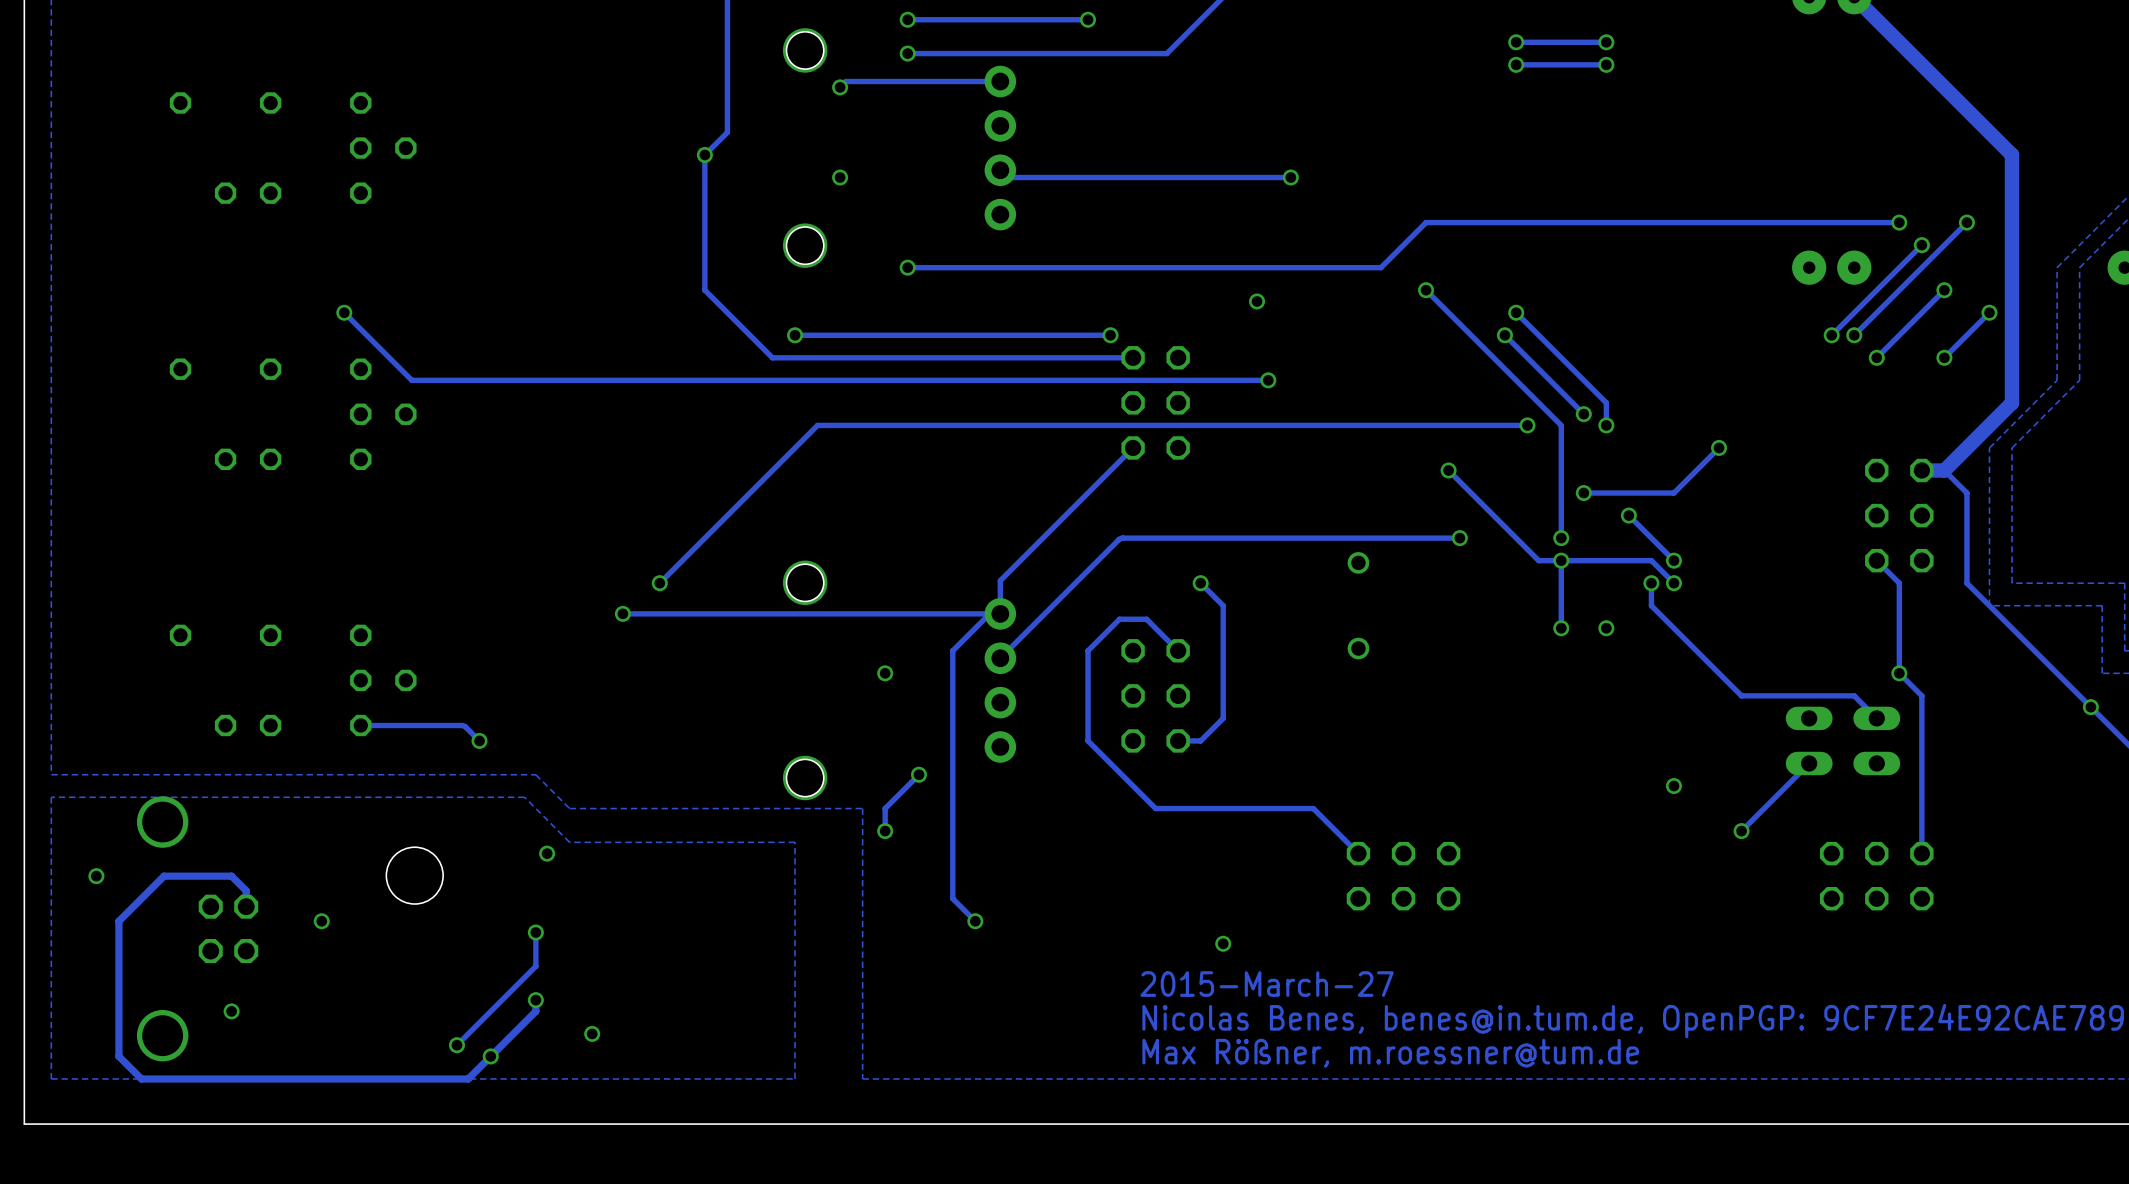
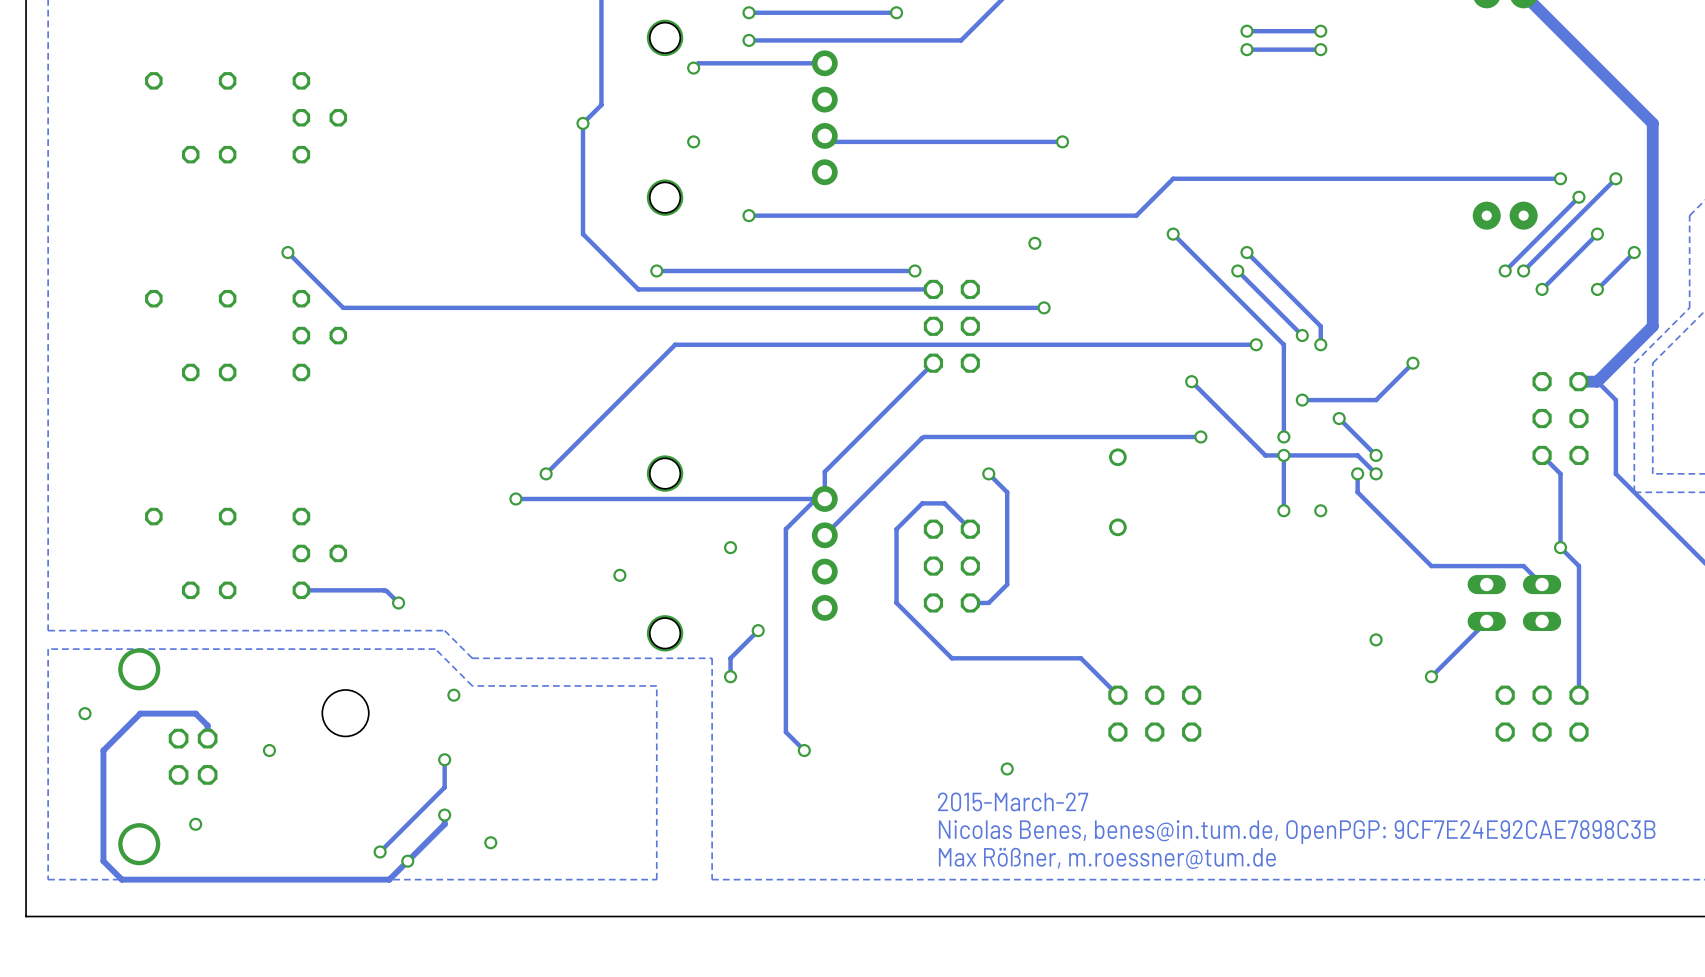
via: none -> (619, 575)

